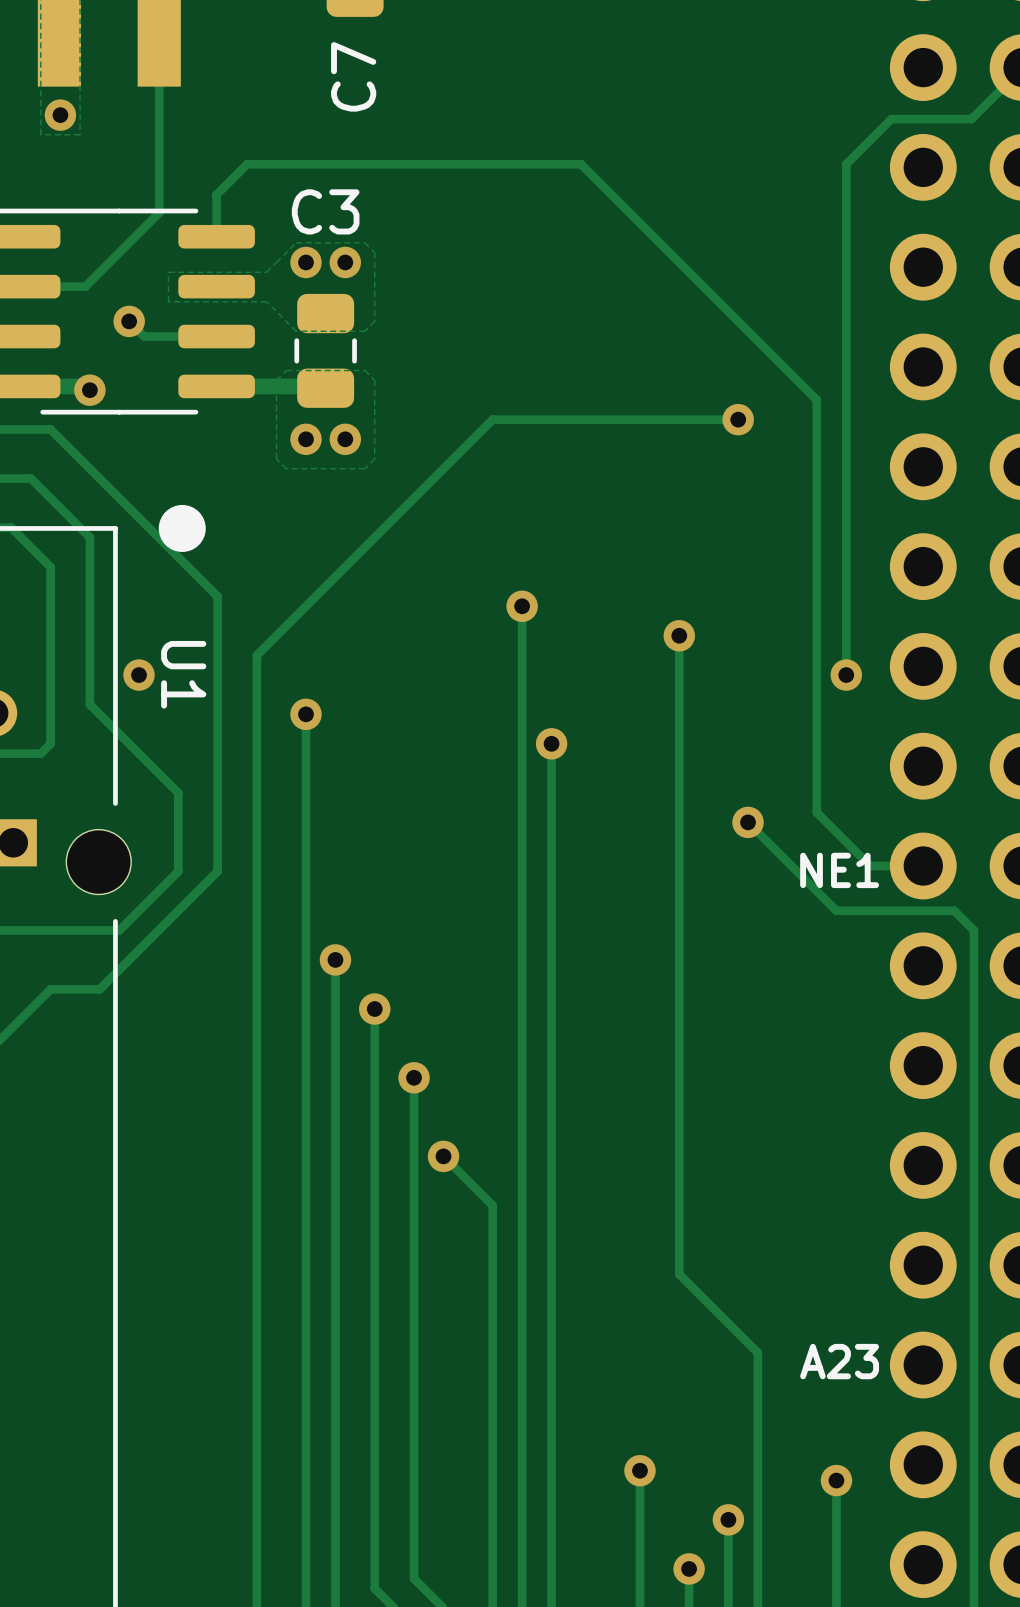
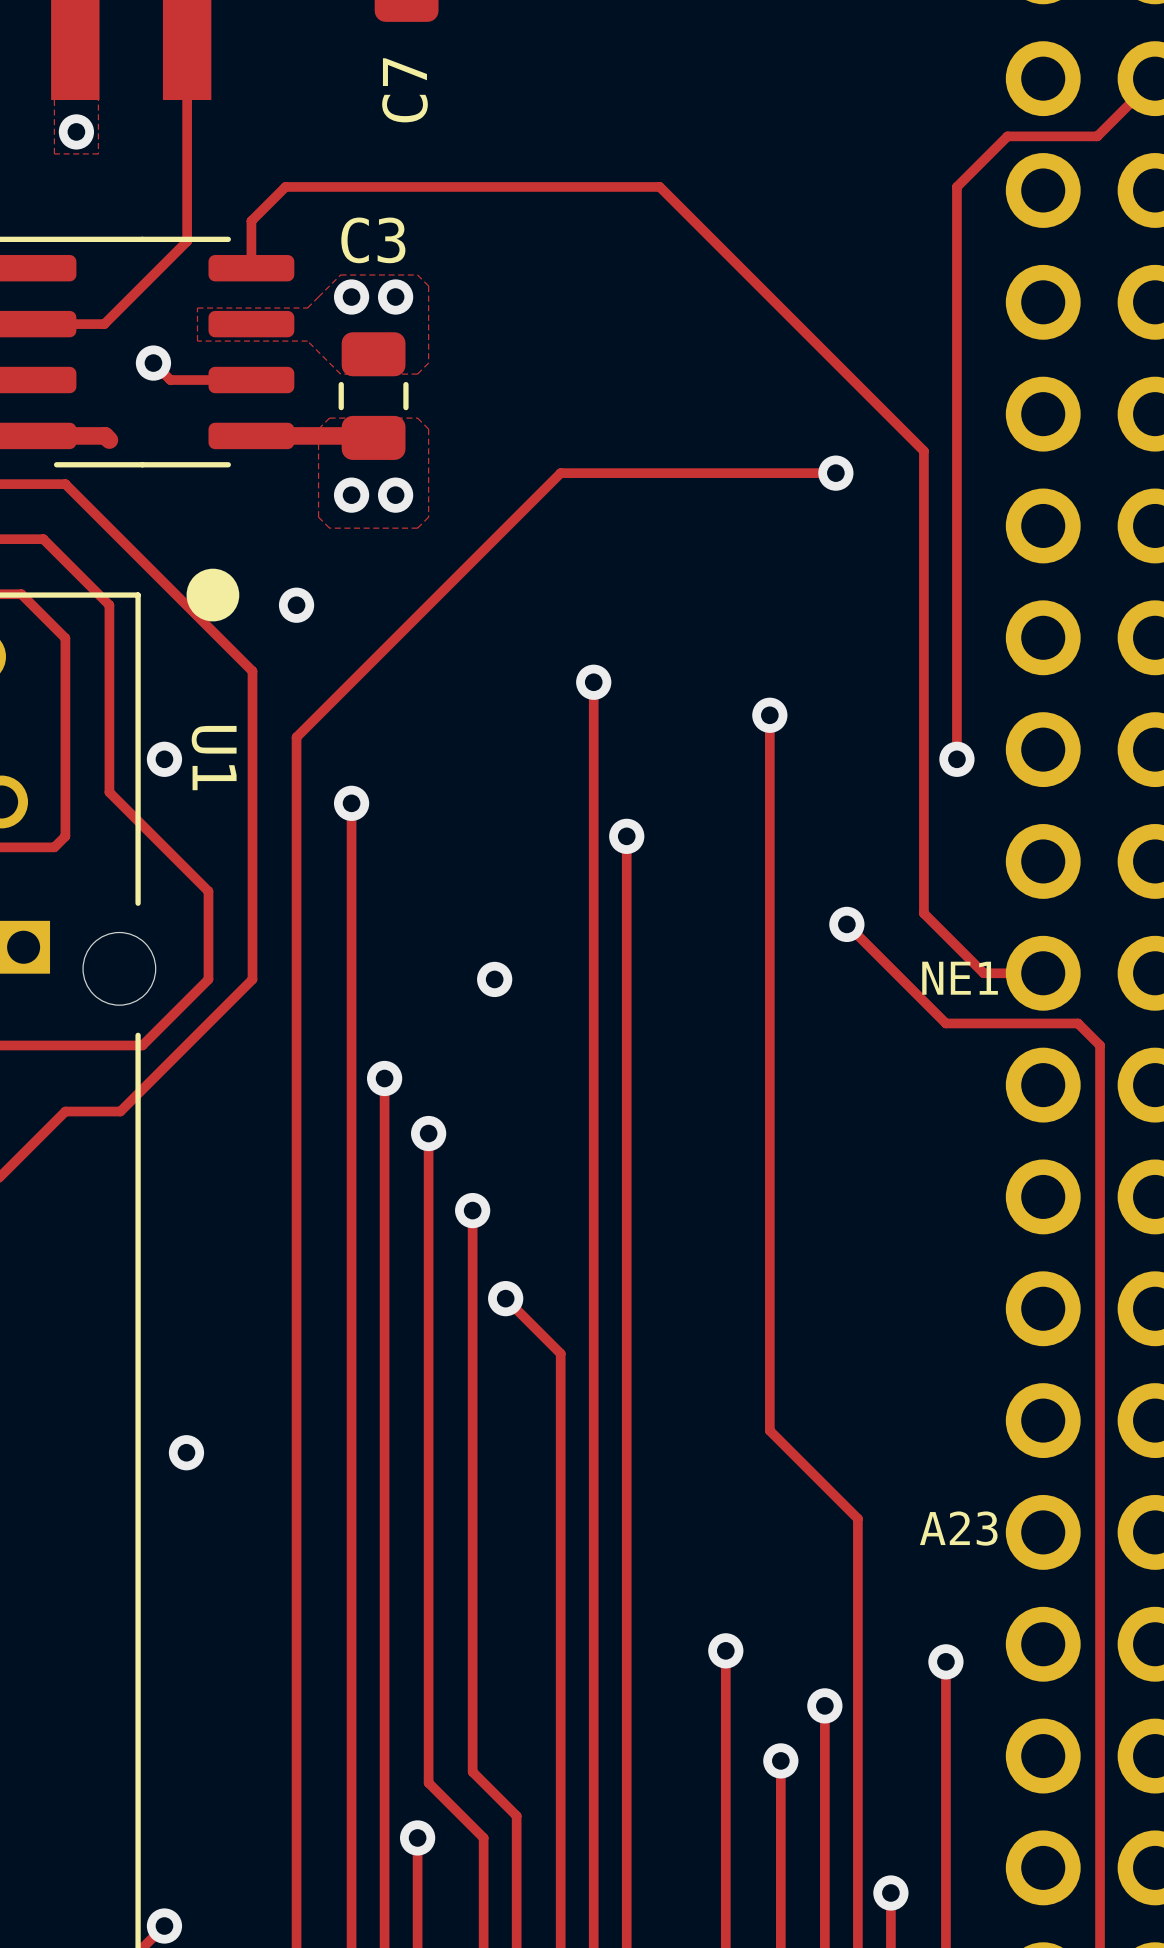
via: (89, 390) -> none
via: none -> (296, 605)
via: none -> (494, 979)
via: none -> (186, 1452)

